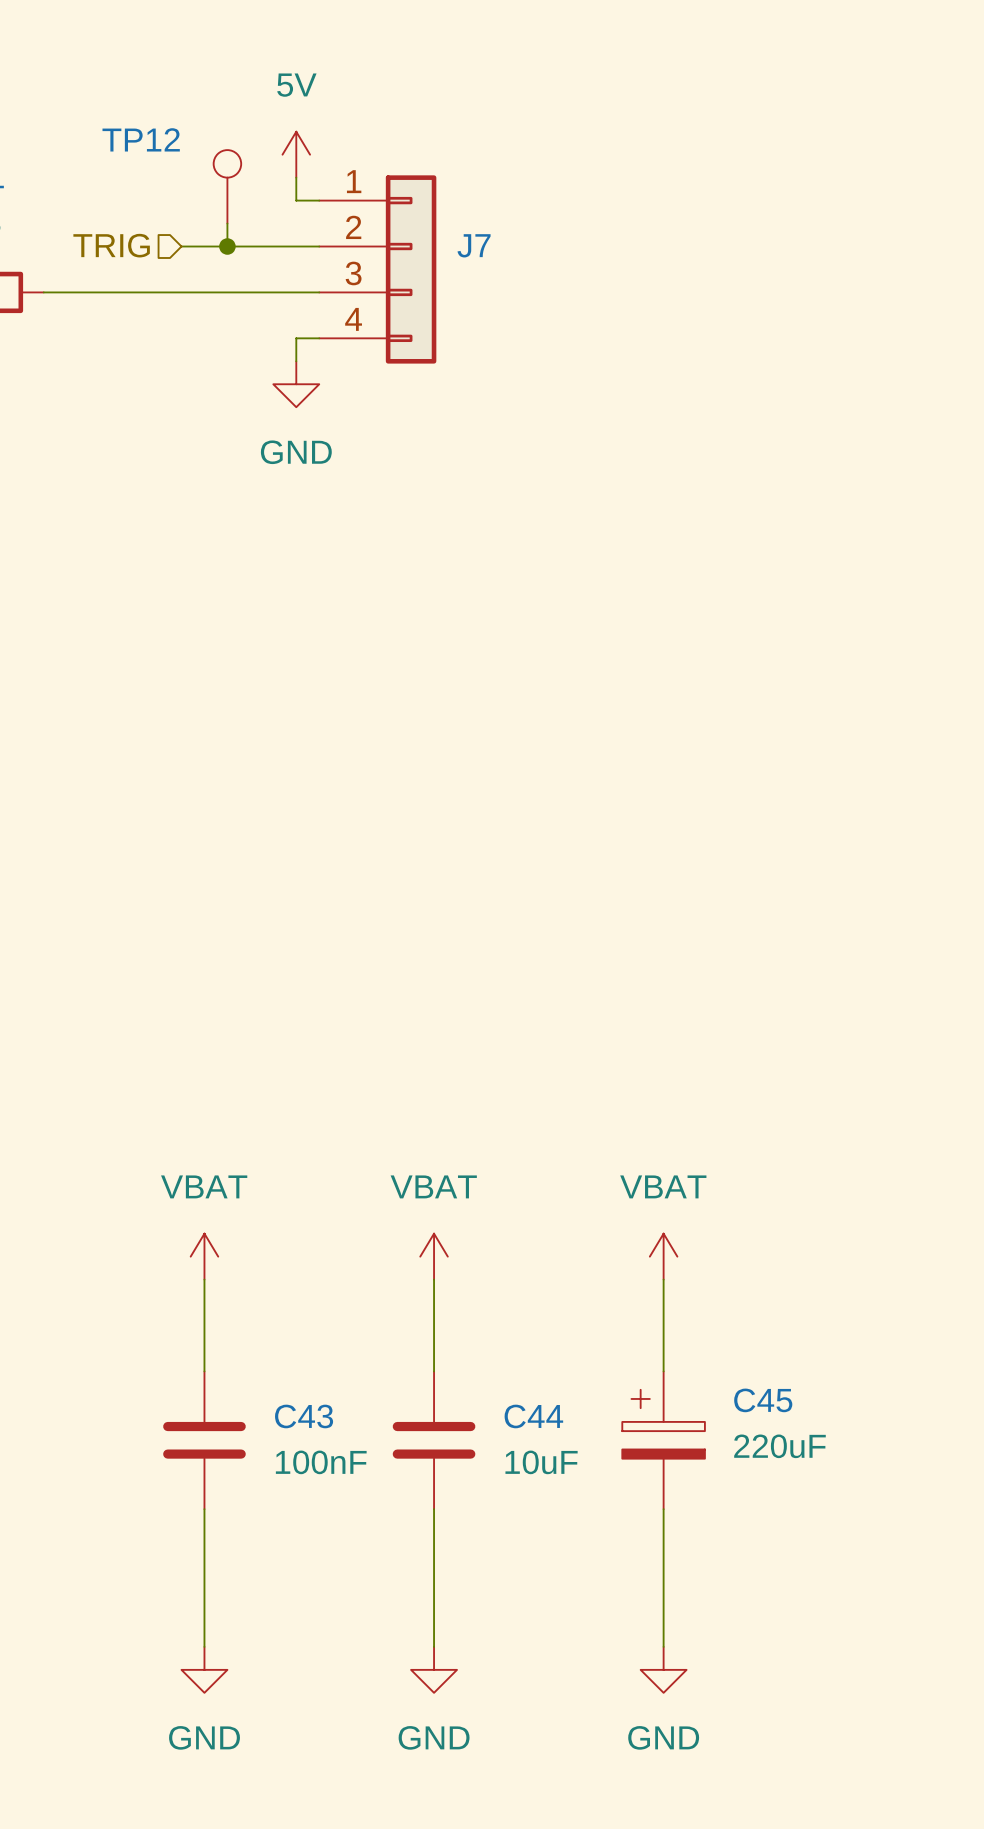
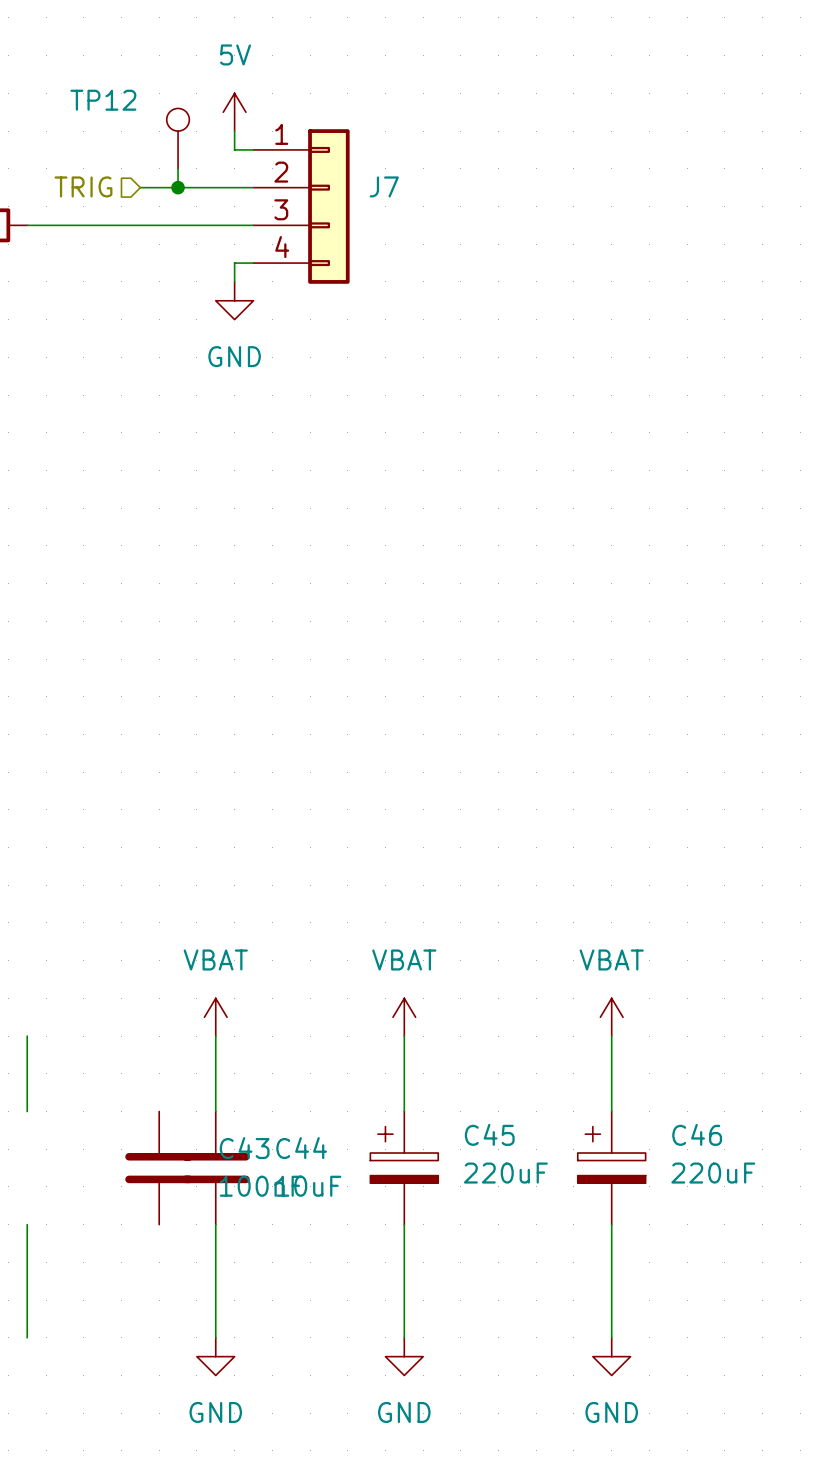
power symbol position: VBAT (204, 1256) -> VBAT (215, 1017)
power symbol position: VBAT (434, 1256) -> VBAT (404, 1017)
power symbol: VBAT (663, 1256) -> none
power symbol: none -> VBAT (611, 1017)
wire: (204, 1279) (204, 1371) -> (27, 1036) (27, 1111)
wire: (434, 1279) (434, 1371) -> (215, 1036) (215, 1111)
wire: (663, 1279) (663, 1371) -> (404, 1036) (404, 1111)
wire: none -> (611, 1036) (611, 1111)
C44 position: (434, 1440) -> (215, 1168)
C45 position: (663, 1440) -> (404, 1168)
C46: none -> 220uF (611, 1168)
wire: (204, 1509) (204, 1646) -> (27, 1224) (27, 1337)
wire: (434, 1509) (434, 1646) -> (215, 1224) (215, 1337)
wire: (663, 1509) (663, 1646) -> (404, 1224) (404, 1337)
wire: none -> (611, 1224) (611, 1337)
power symbol position: GND (204, 1669) -> GND (215, 1356)
power symbol position: GND (434, 1669) -> GND (404, 1356)
power symbol: GND (663, 1669) -> none
power symbol: none -> GND (611, 1356)

